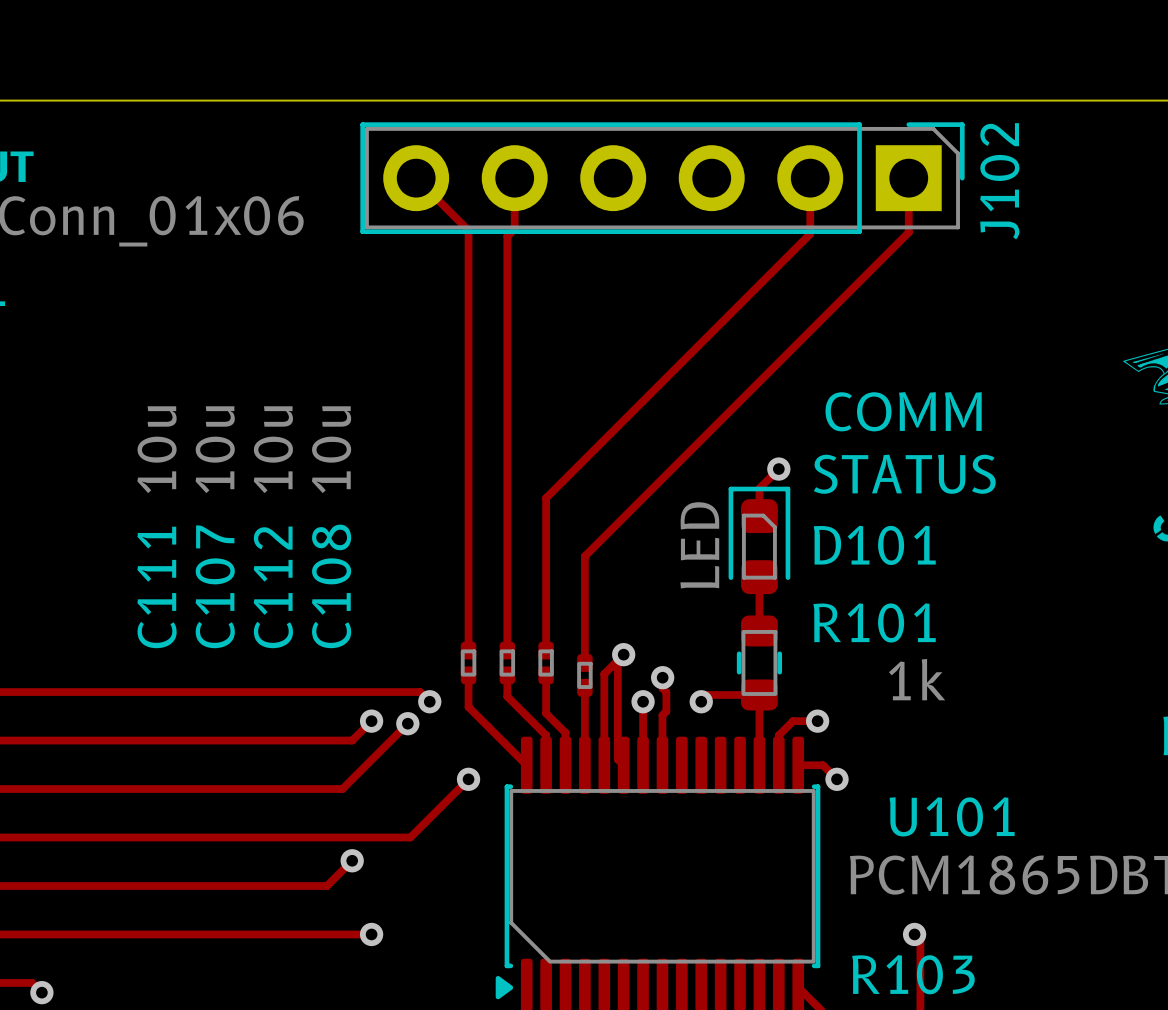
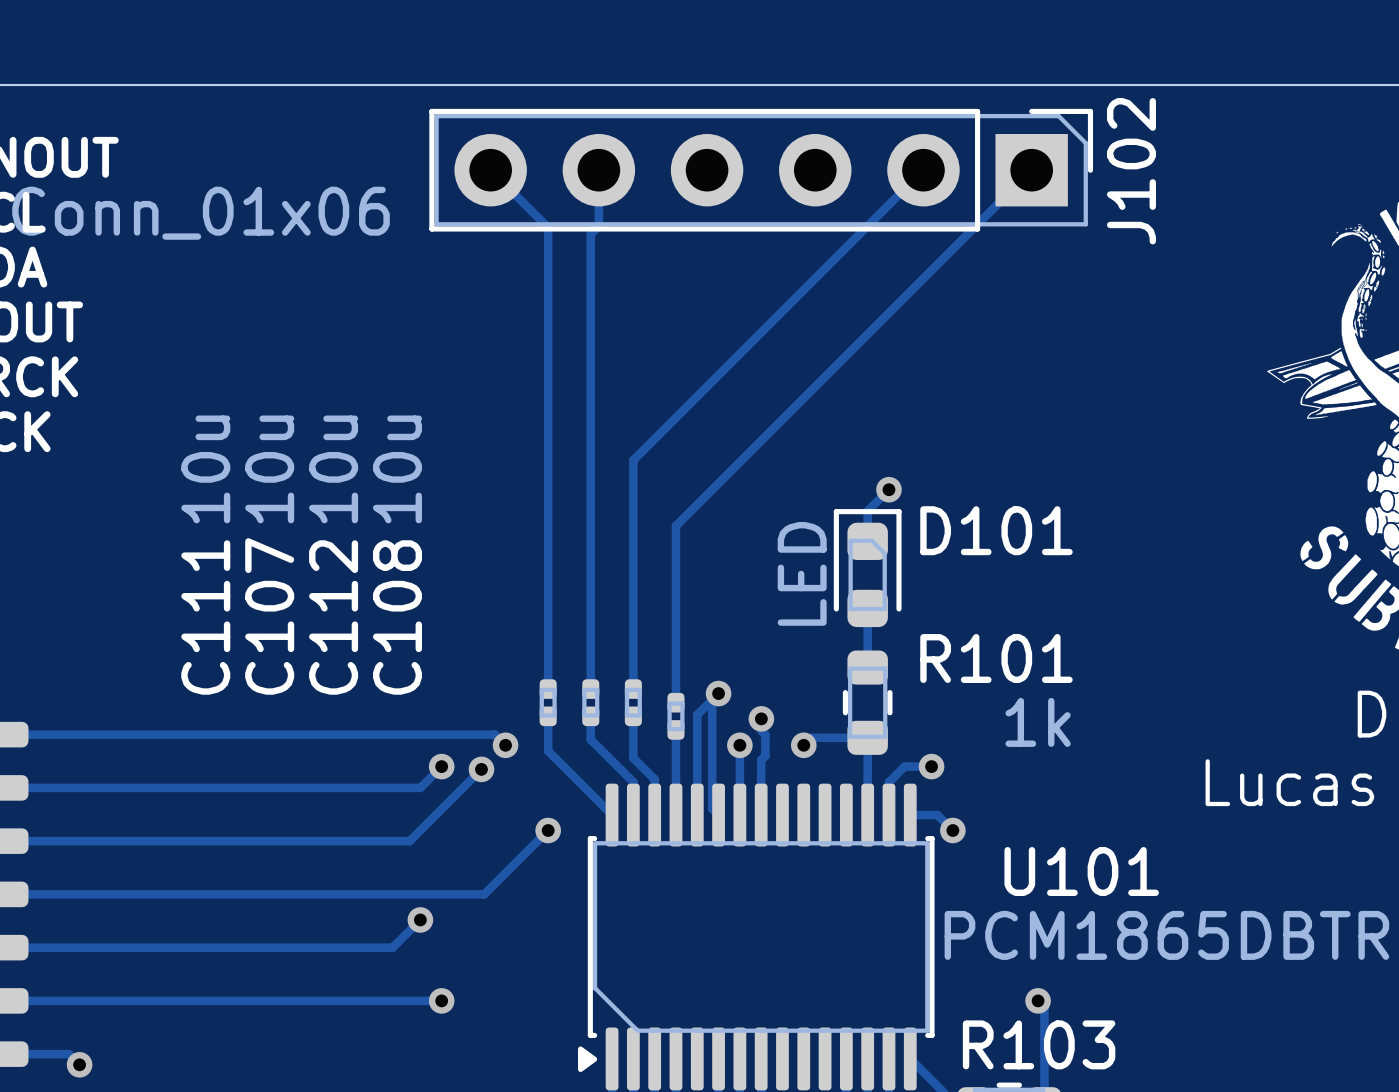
track: (810, 178) (810, 234) (546, 498) -> (923, 170) (633, 460) (633, 521)
track: (908, 178) (908, 232) (584, 556) -> (1031, 170) (675, 525) (675, 585)
text: COMM (903, 411) -> none
text: STATUS (904, 474) -> none
D101 name position: D101 (874, 545) -> D101 (996, 530)

